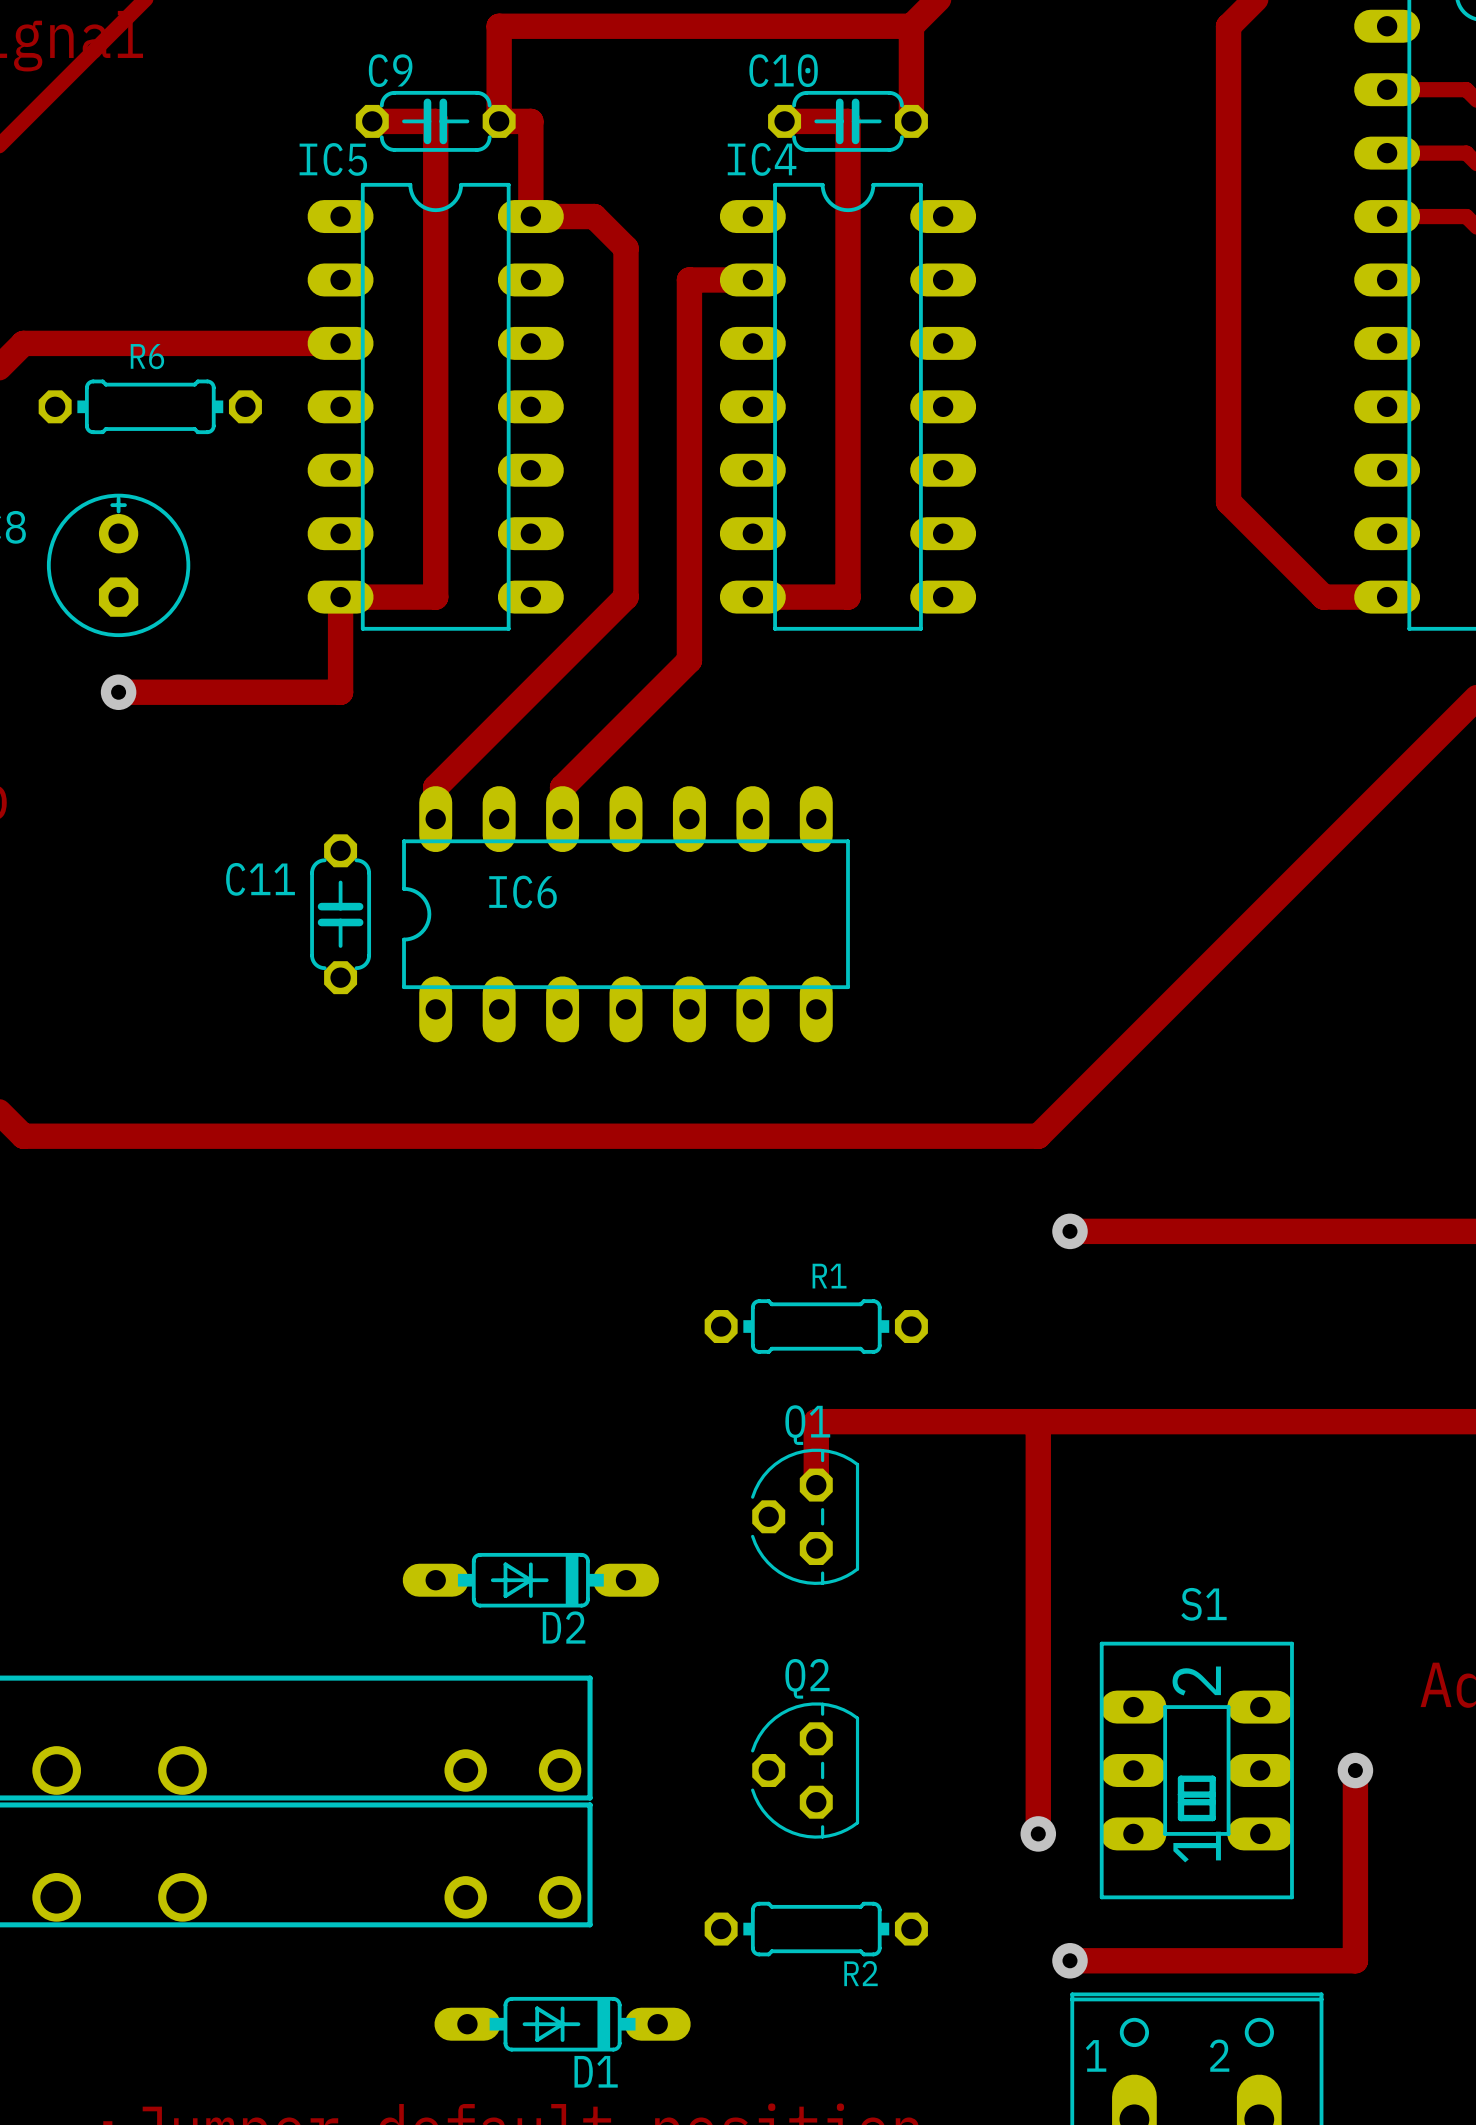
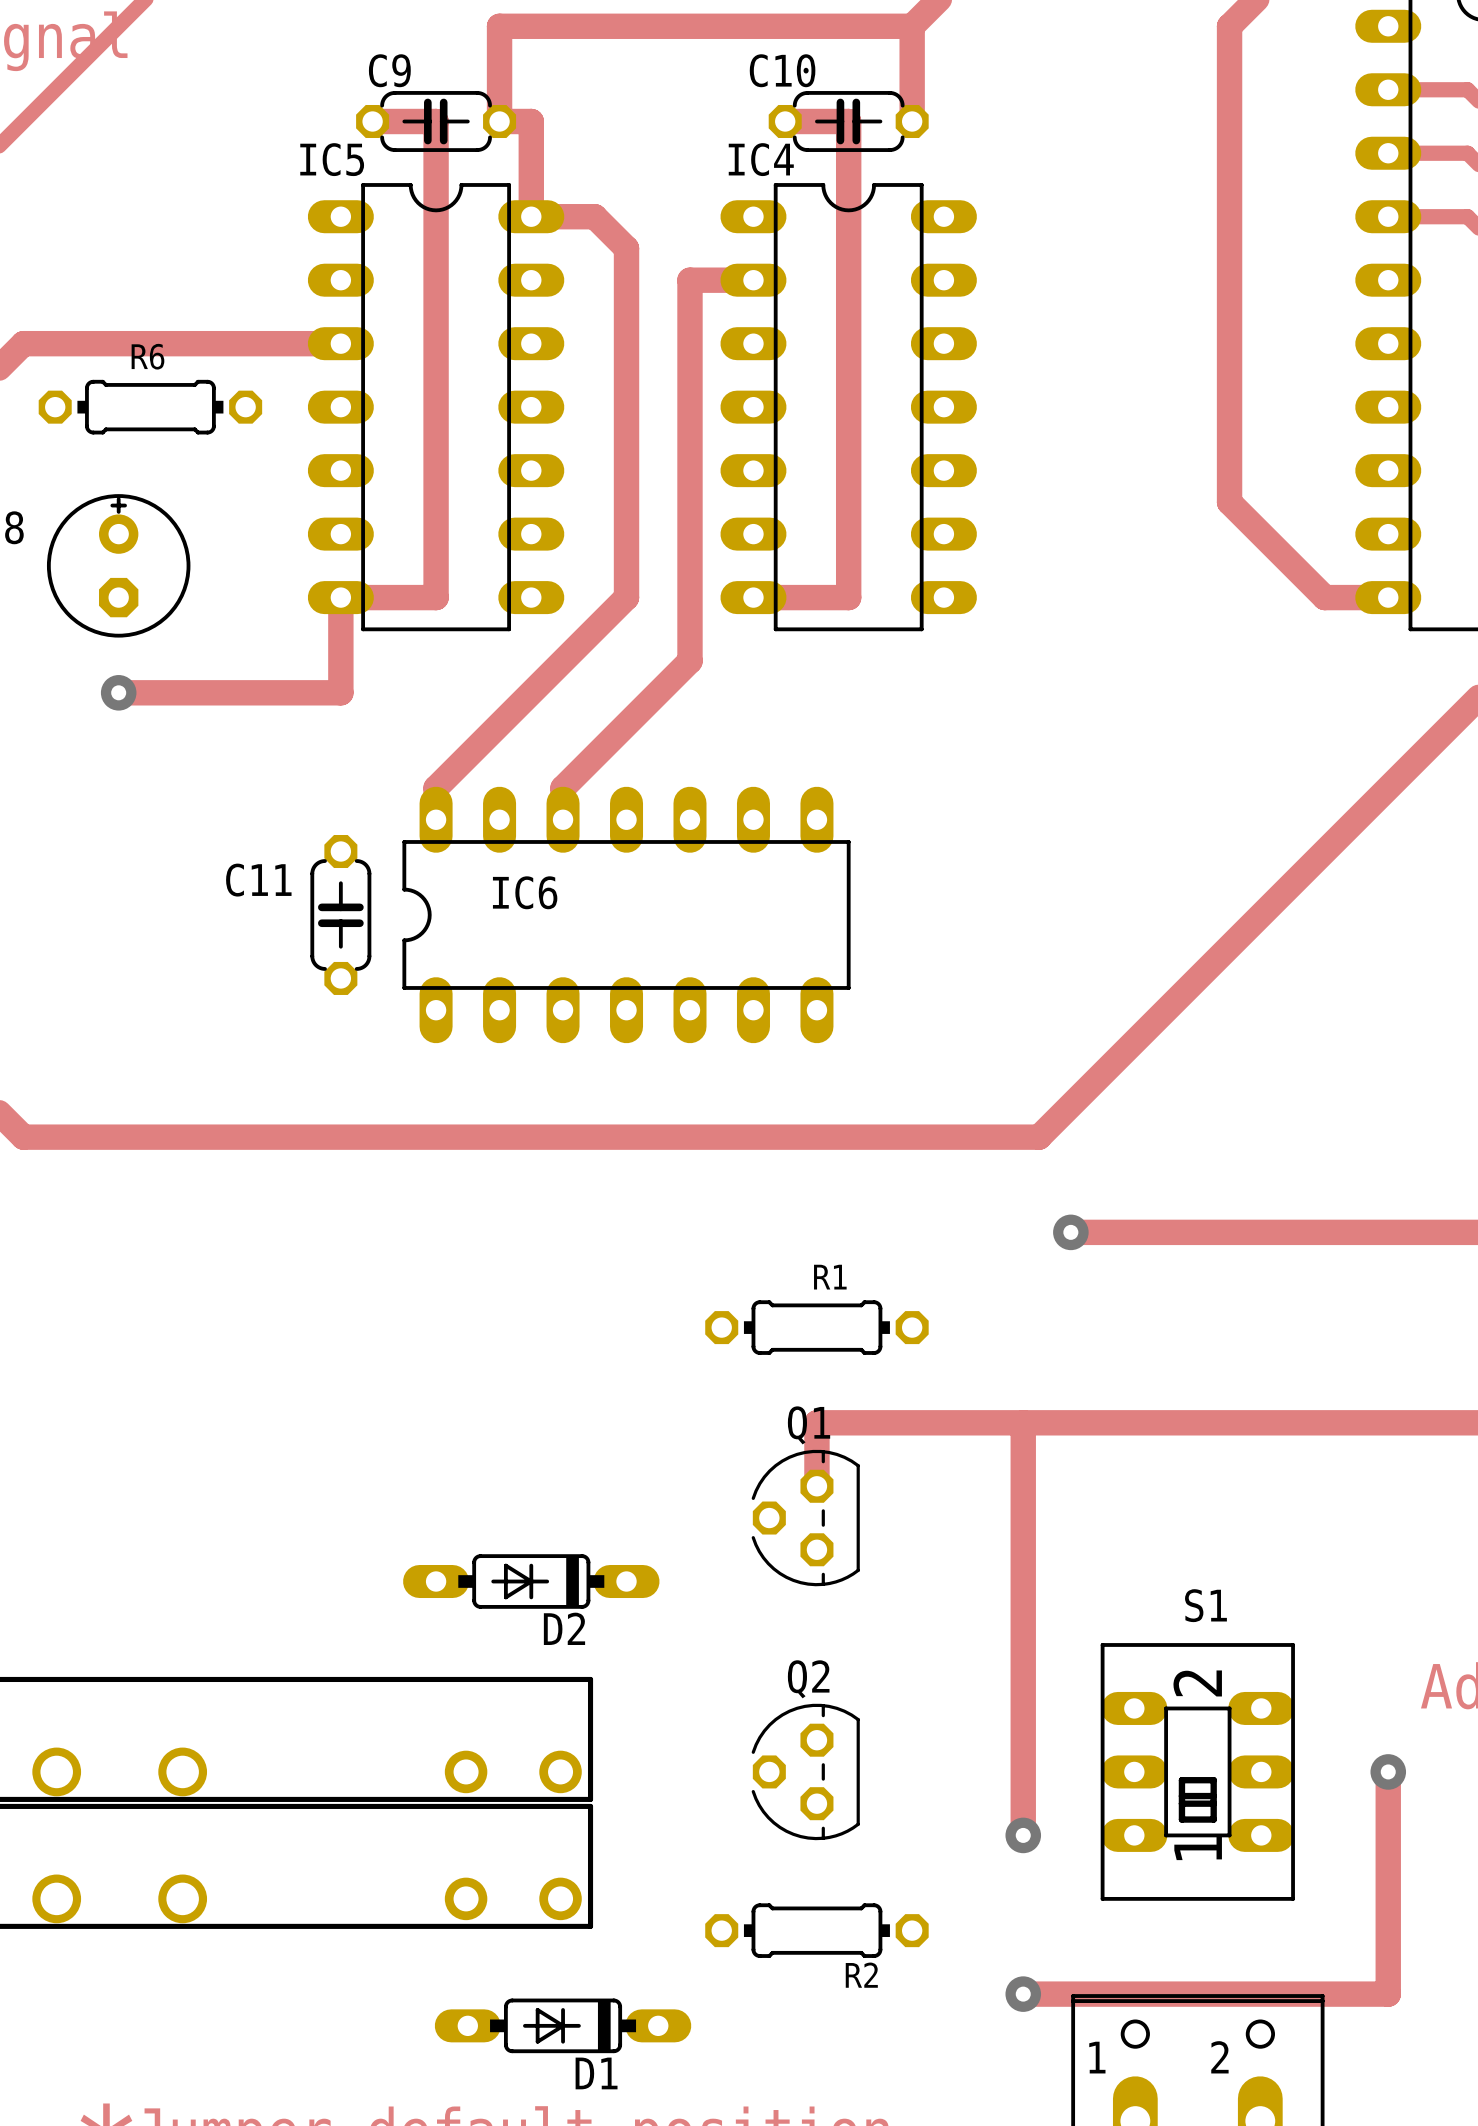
track: (1038, 1421) (1038, 1833) -> (1023, 1422) (1023, 1835)
track: (1355, 1770) (1355, 1960) (1069, 1960) -> none
via position: (1355, 1770) -> (1388, 1771)
track: none -> (1388, 1771) (1388, 1994) (1023, 1994)
via position: (1038, 1833) -> (1023, 1835)
via position: (1069, 1960) -> (1023, 1994)

